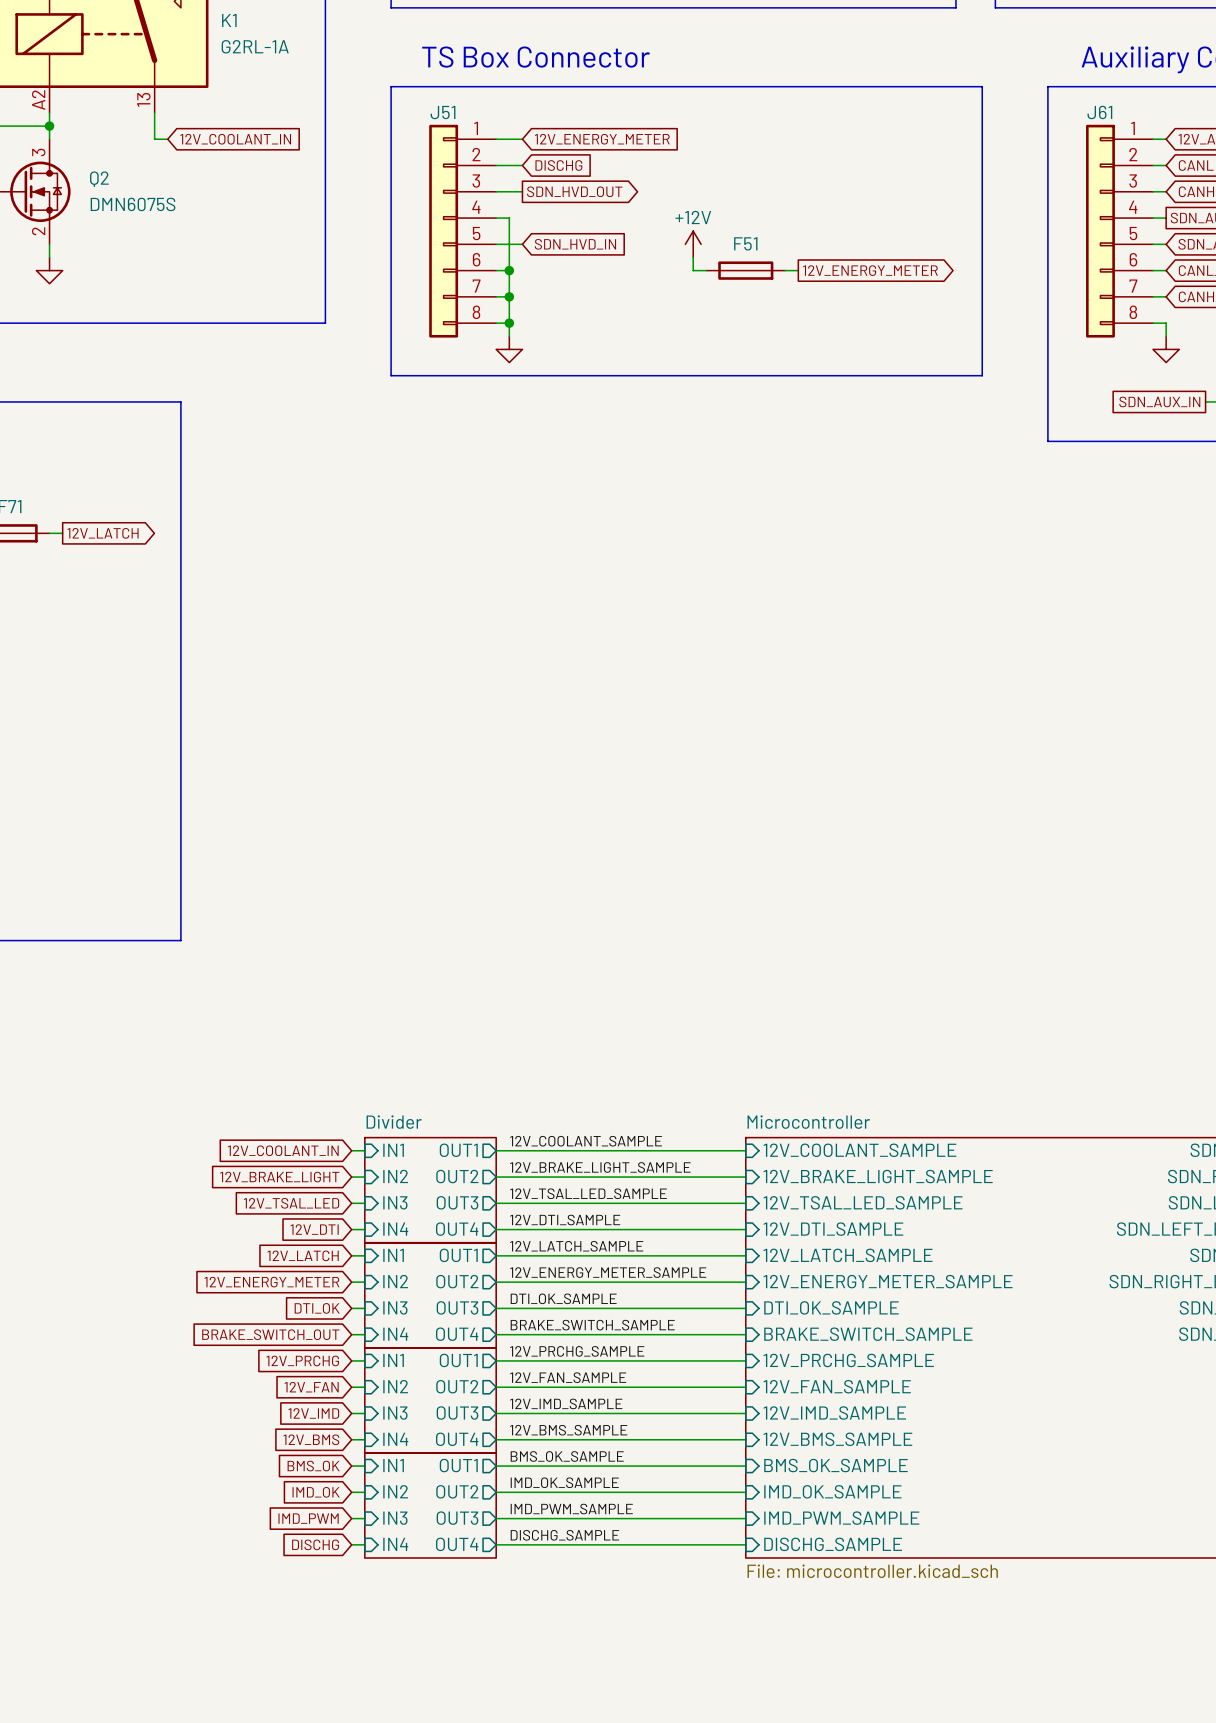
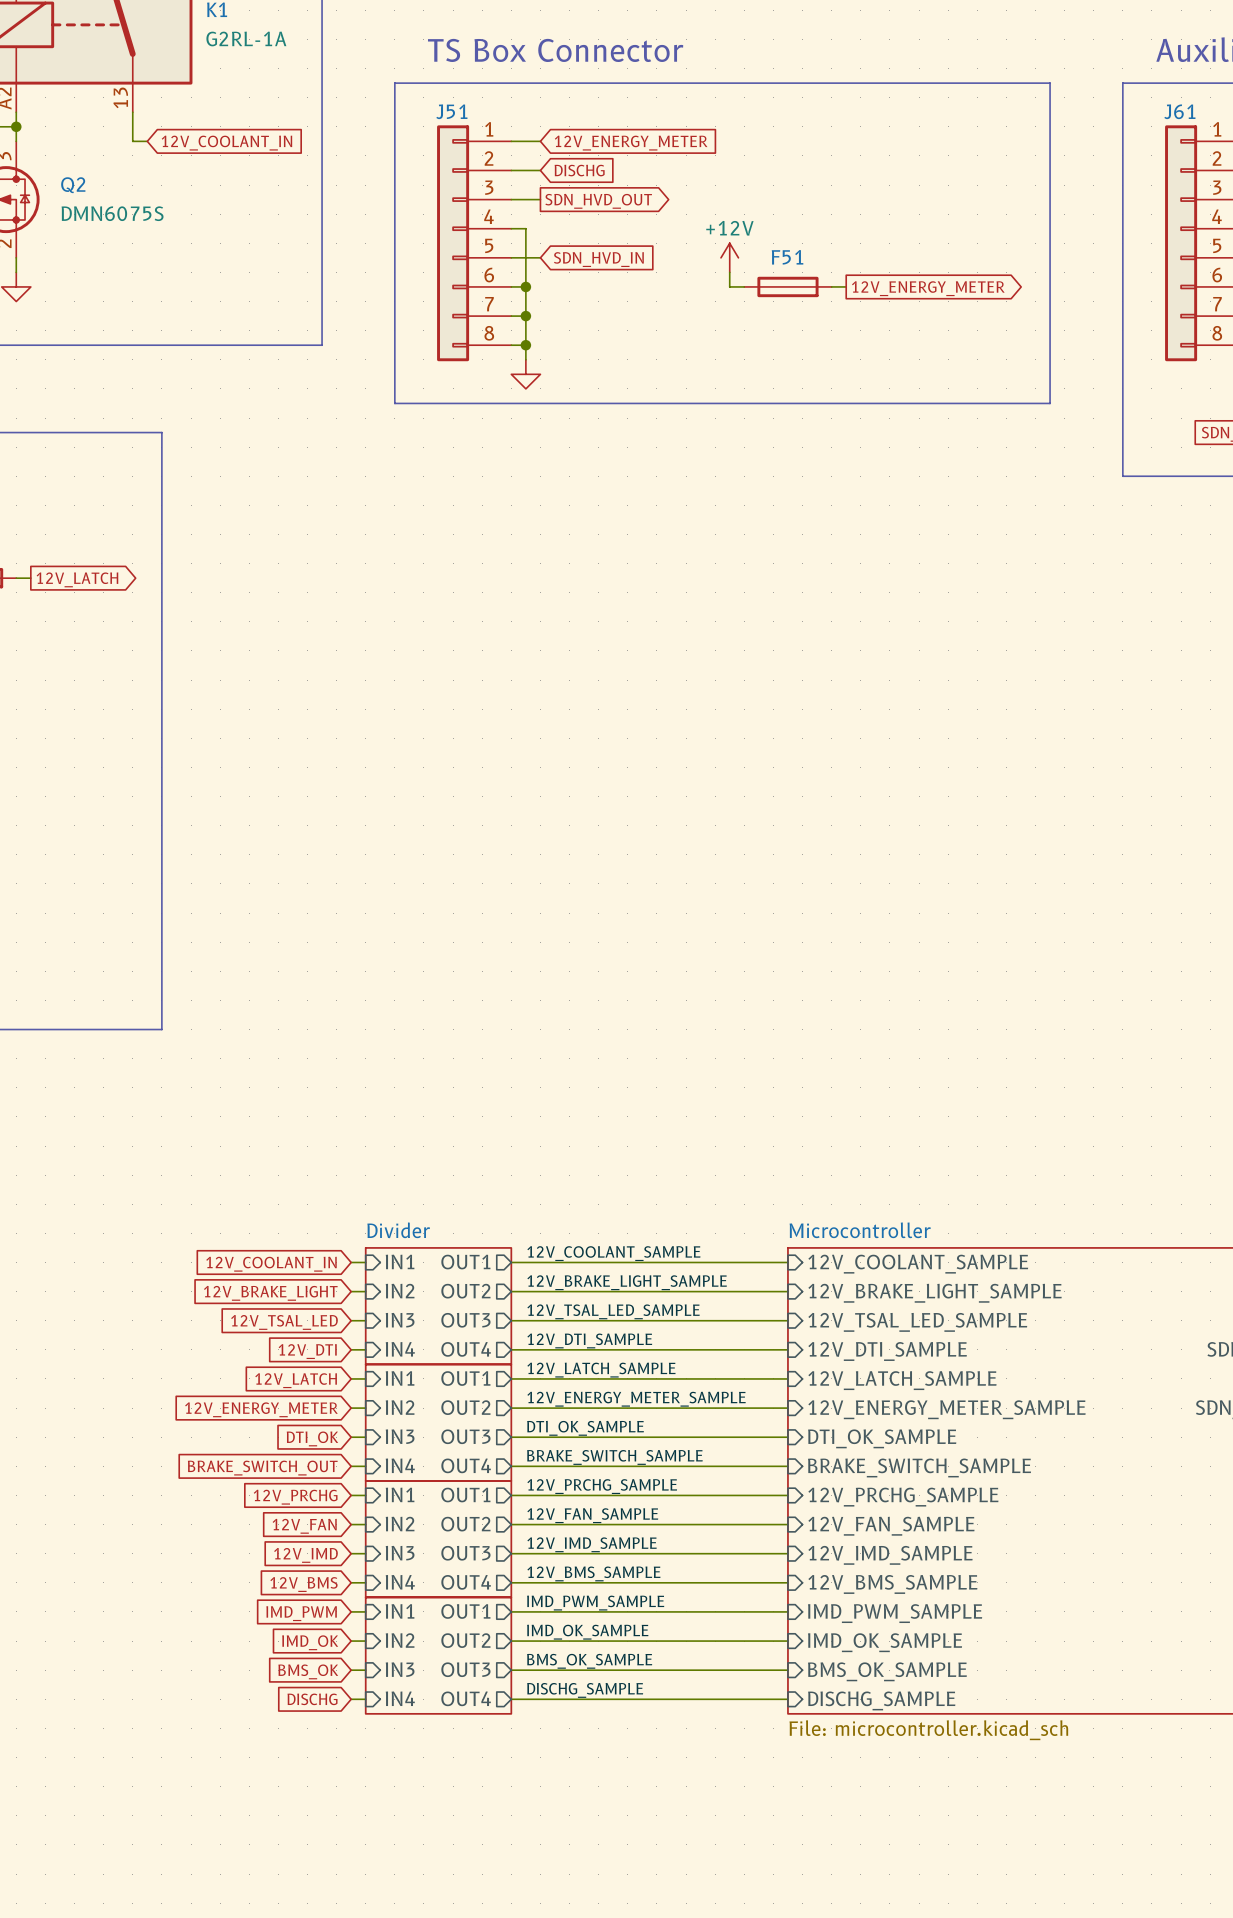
label: BMS_OK_SAMPLE (567, 1456) -> IMD_PWM_SAMPLE (595, 1603)
sheet pin: BMS_OK_SAMPLE (835, 1465) -> IMD_PWM_SAMPLE (895, 1613)
global label: BMS_OK (313, 1466) -> IMD_PWM (301, 1613)
label: IMD_PWM_SAMPLE (571, 1509) -> BMS_OK_SAMPLE (589, 1661)
global label: IMD_PWM (308, 1518) -> BMS_OK (308, 1671)
sheet pin: IMD_PWM_SAMPLE (841, 1518) -> BMS_OK_SAMPLE (887, 1671)

